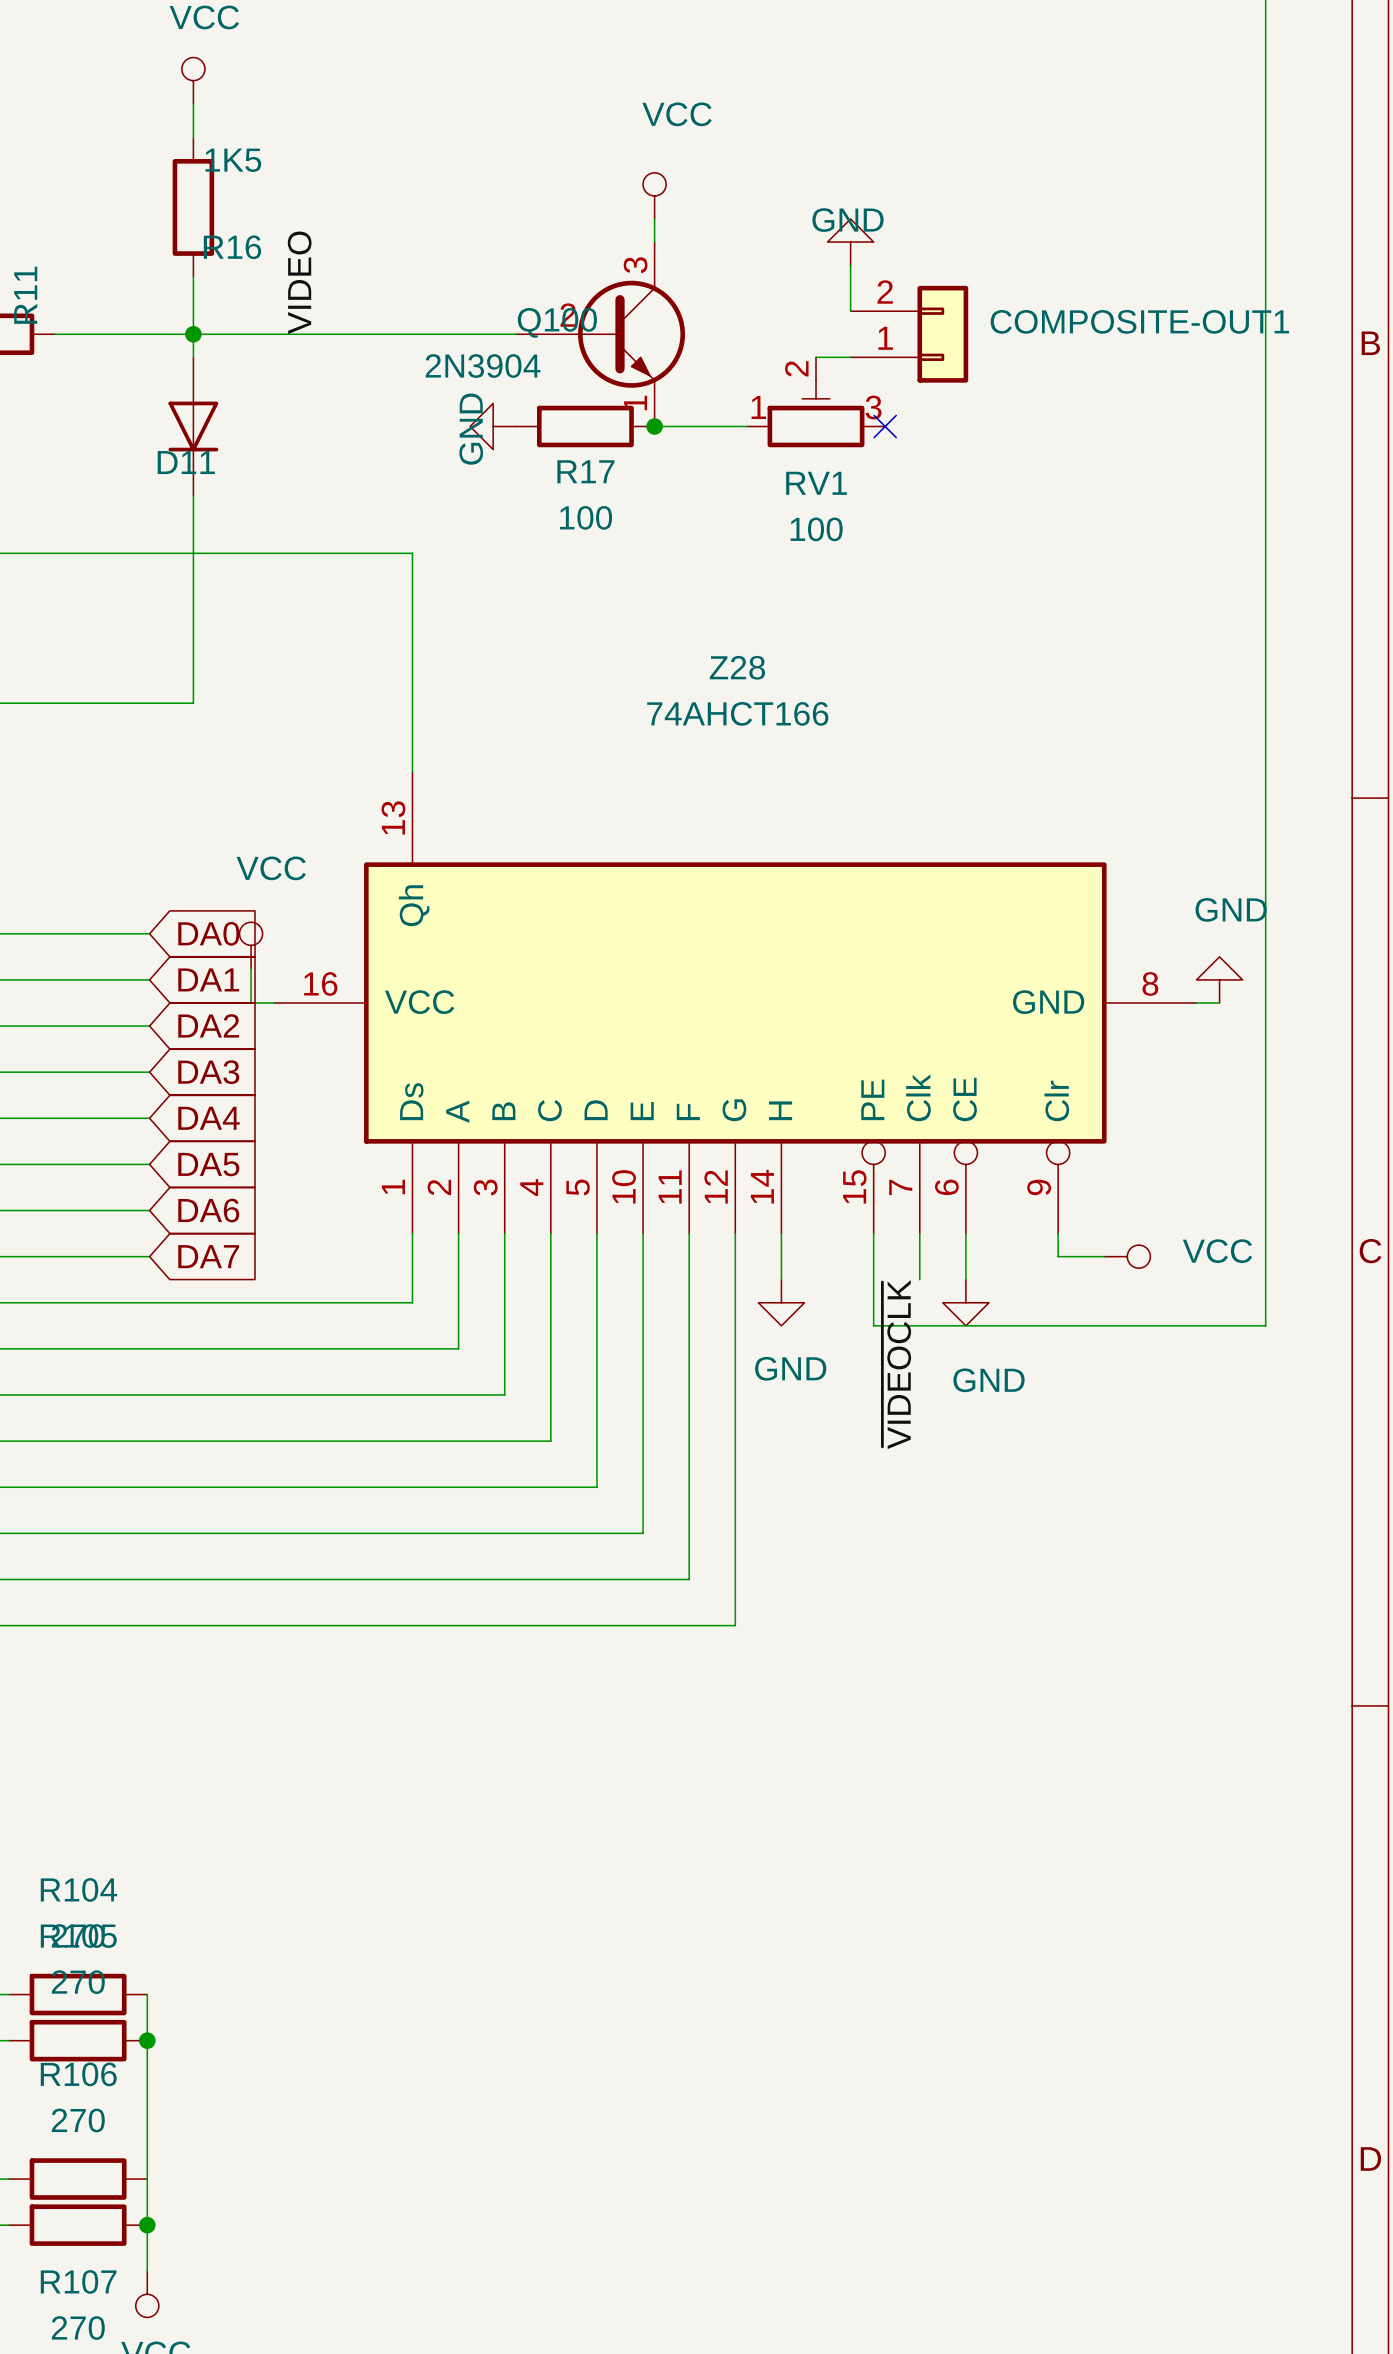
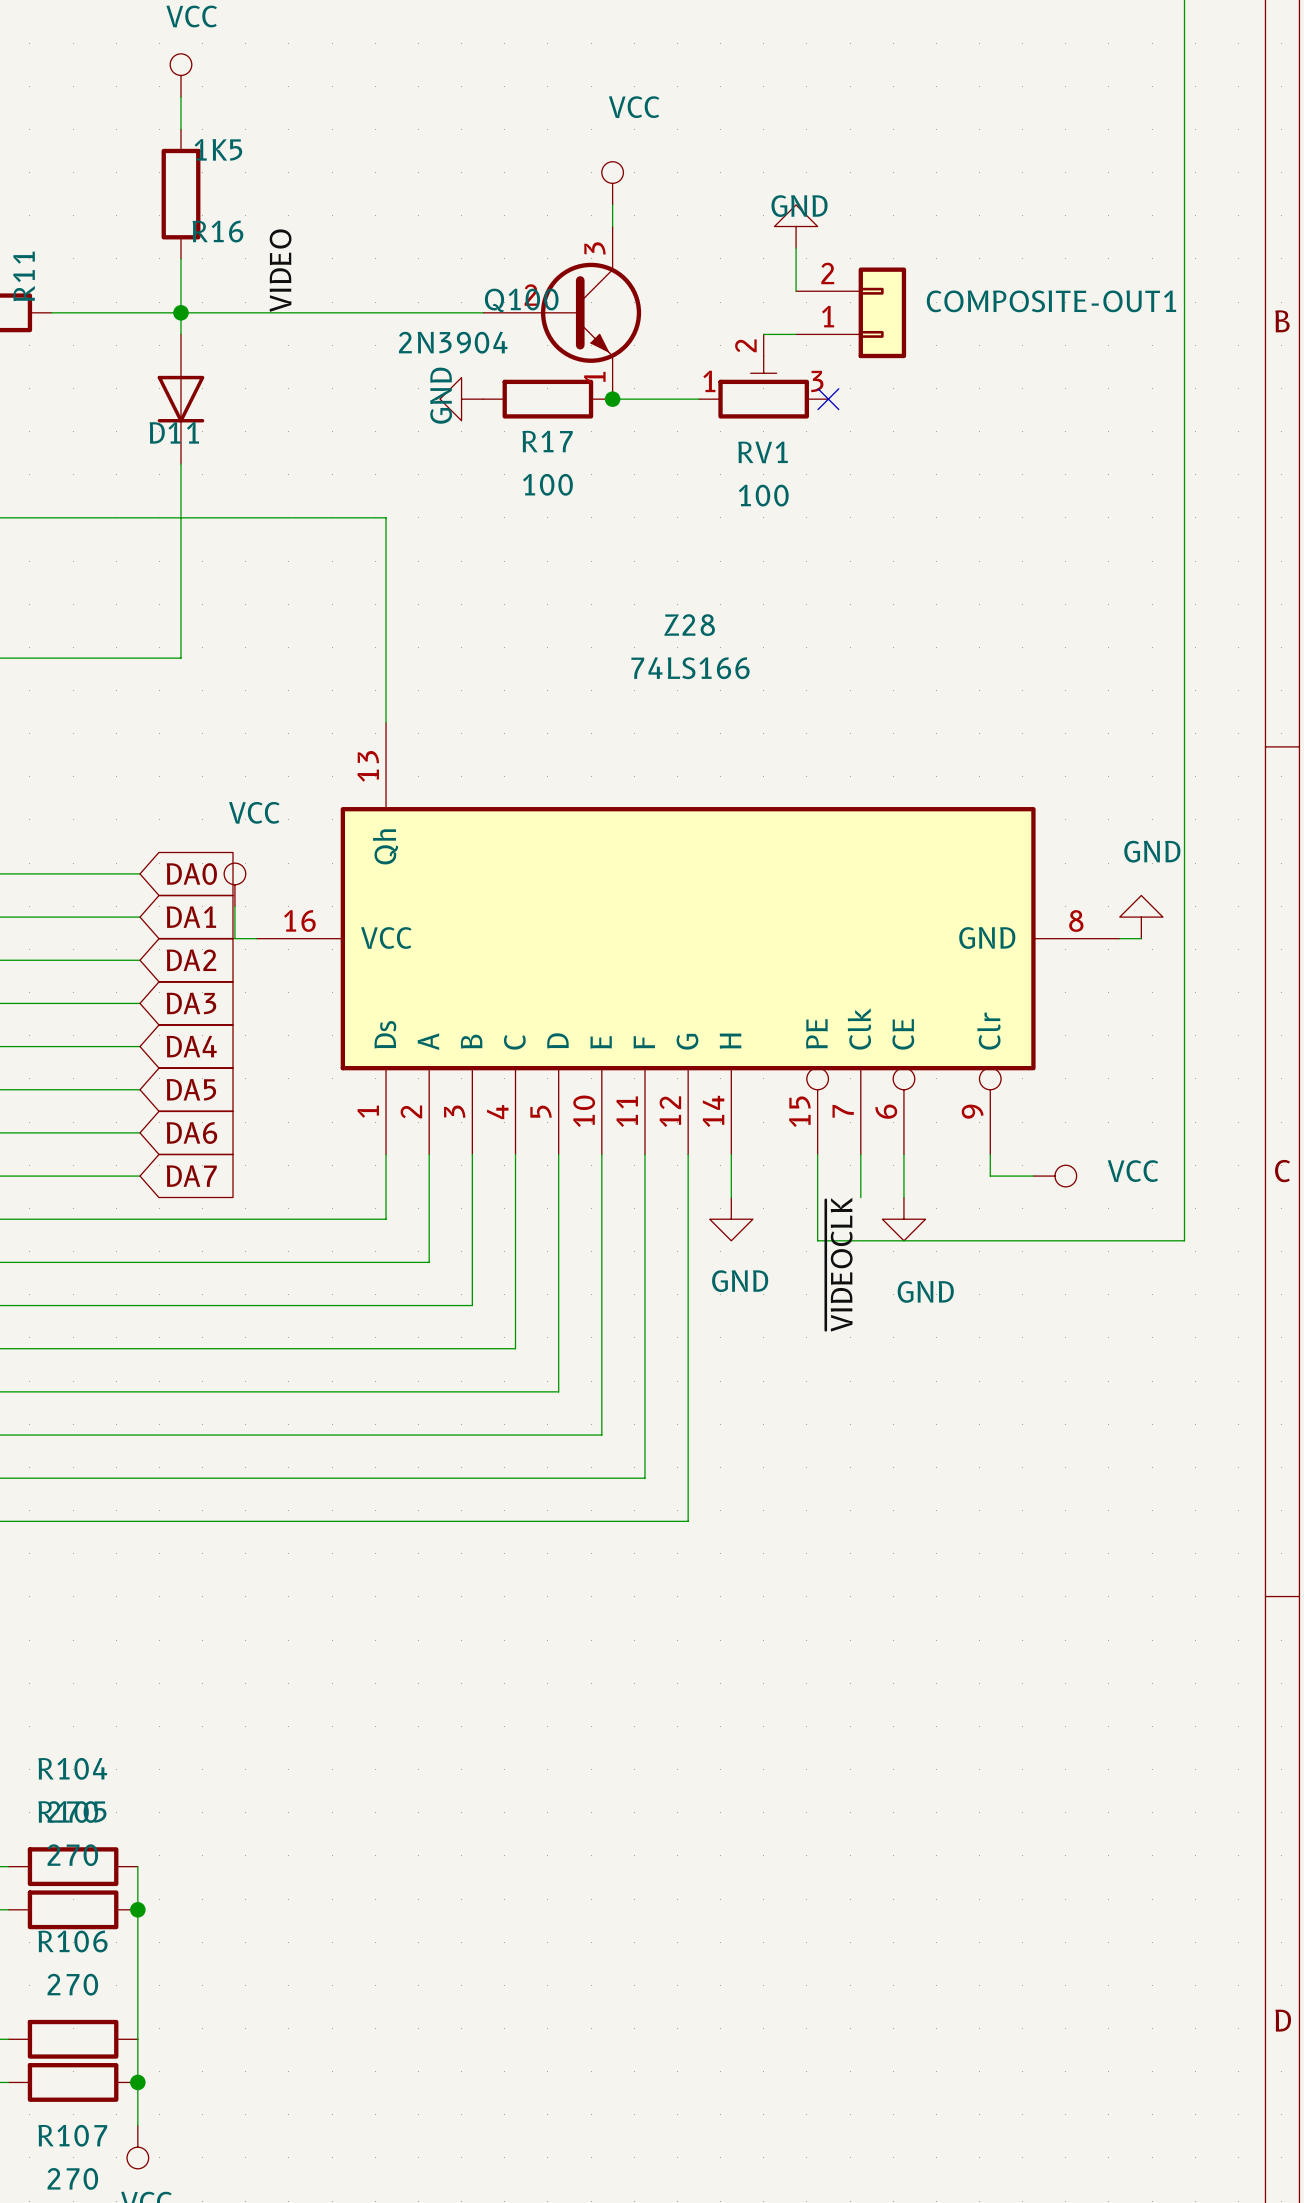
Z28 value: 74AHCT166 (737, 713) -> 74LS166 (690, 668)

